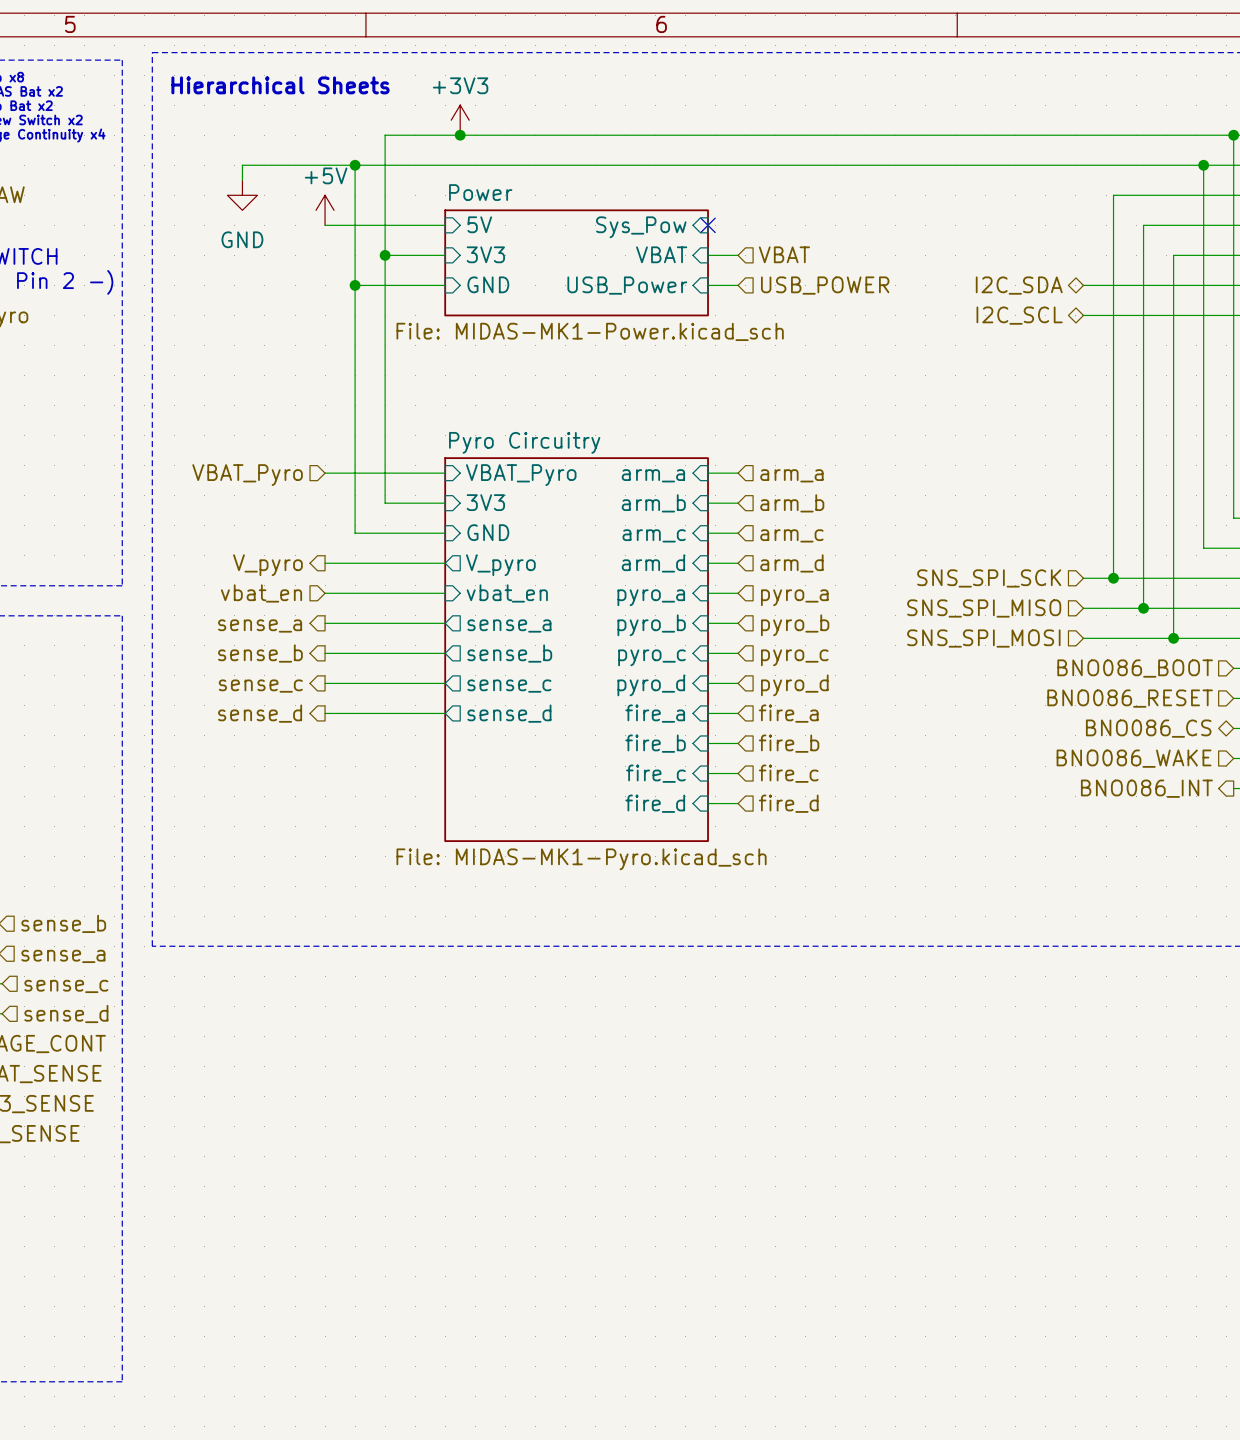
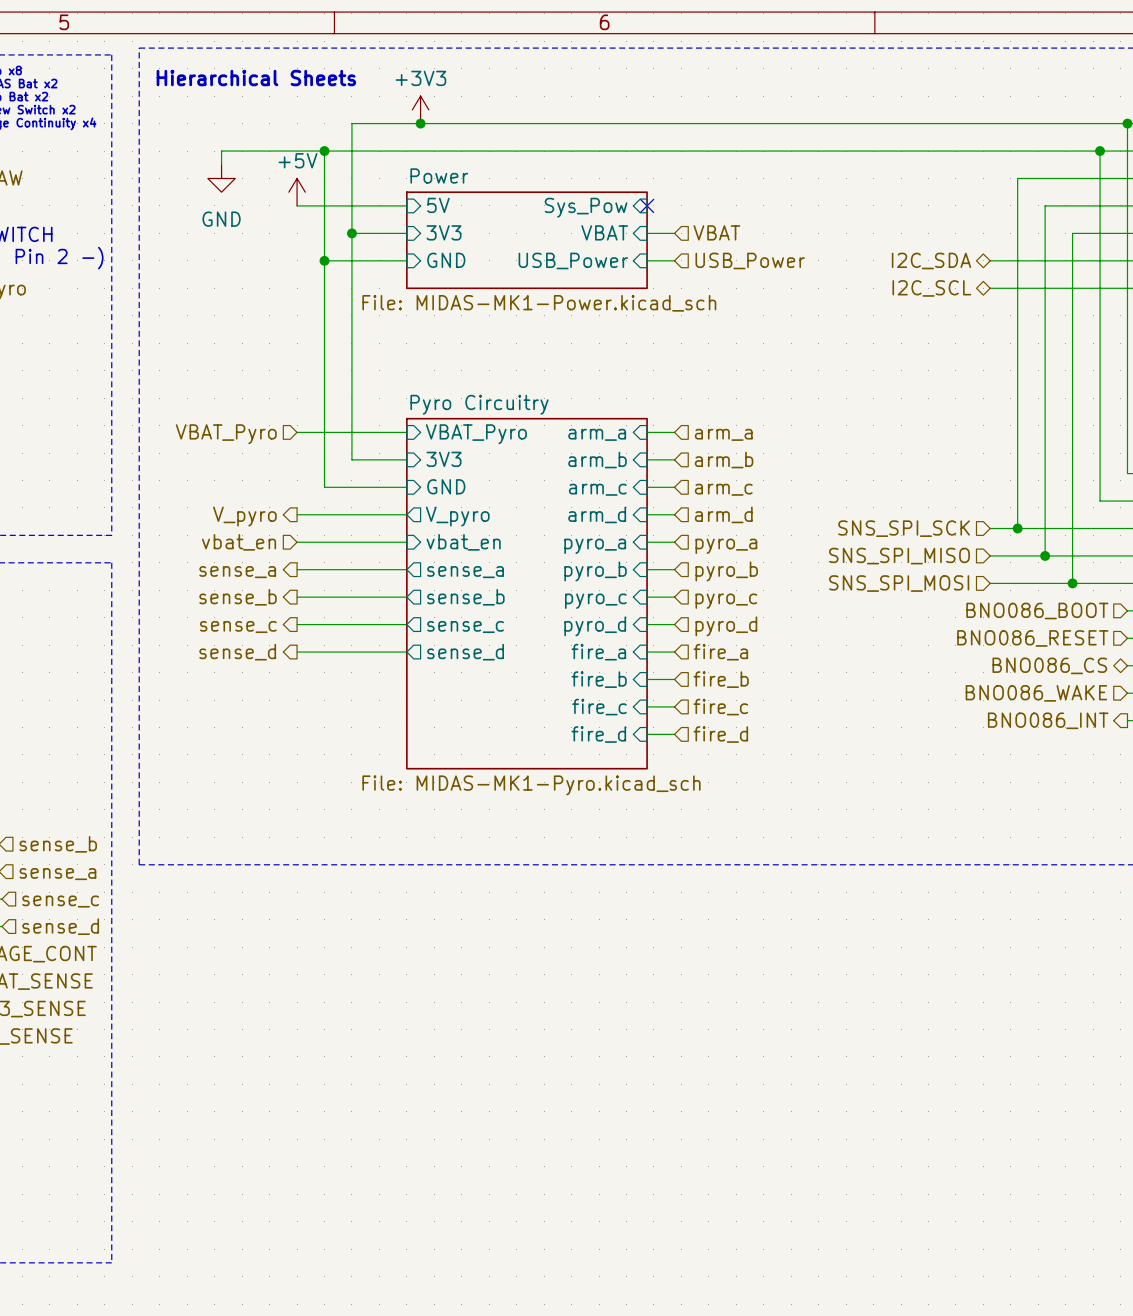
hierarchical label: USB_POWER (825, 285) -> USB_Power (750, 260)

